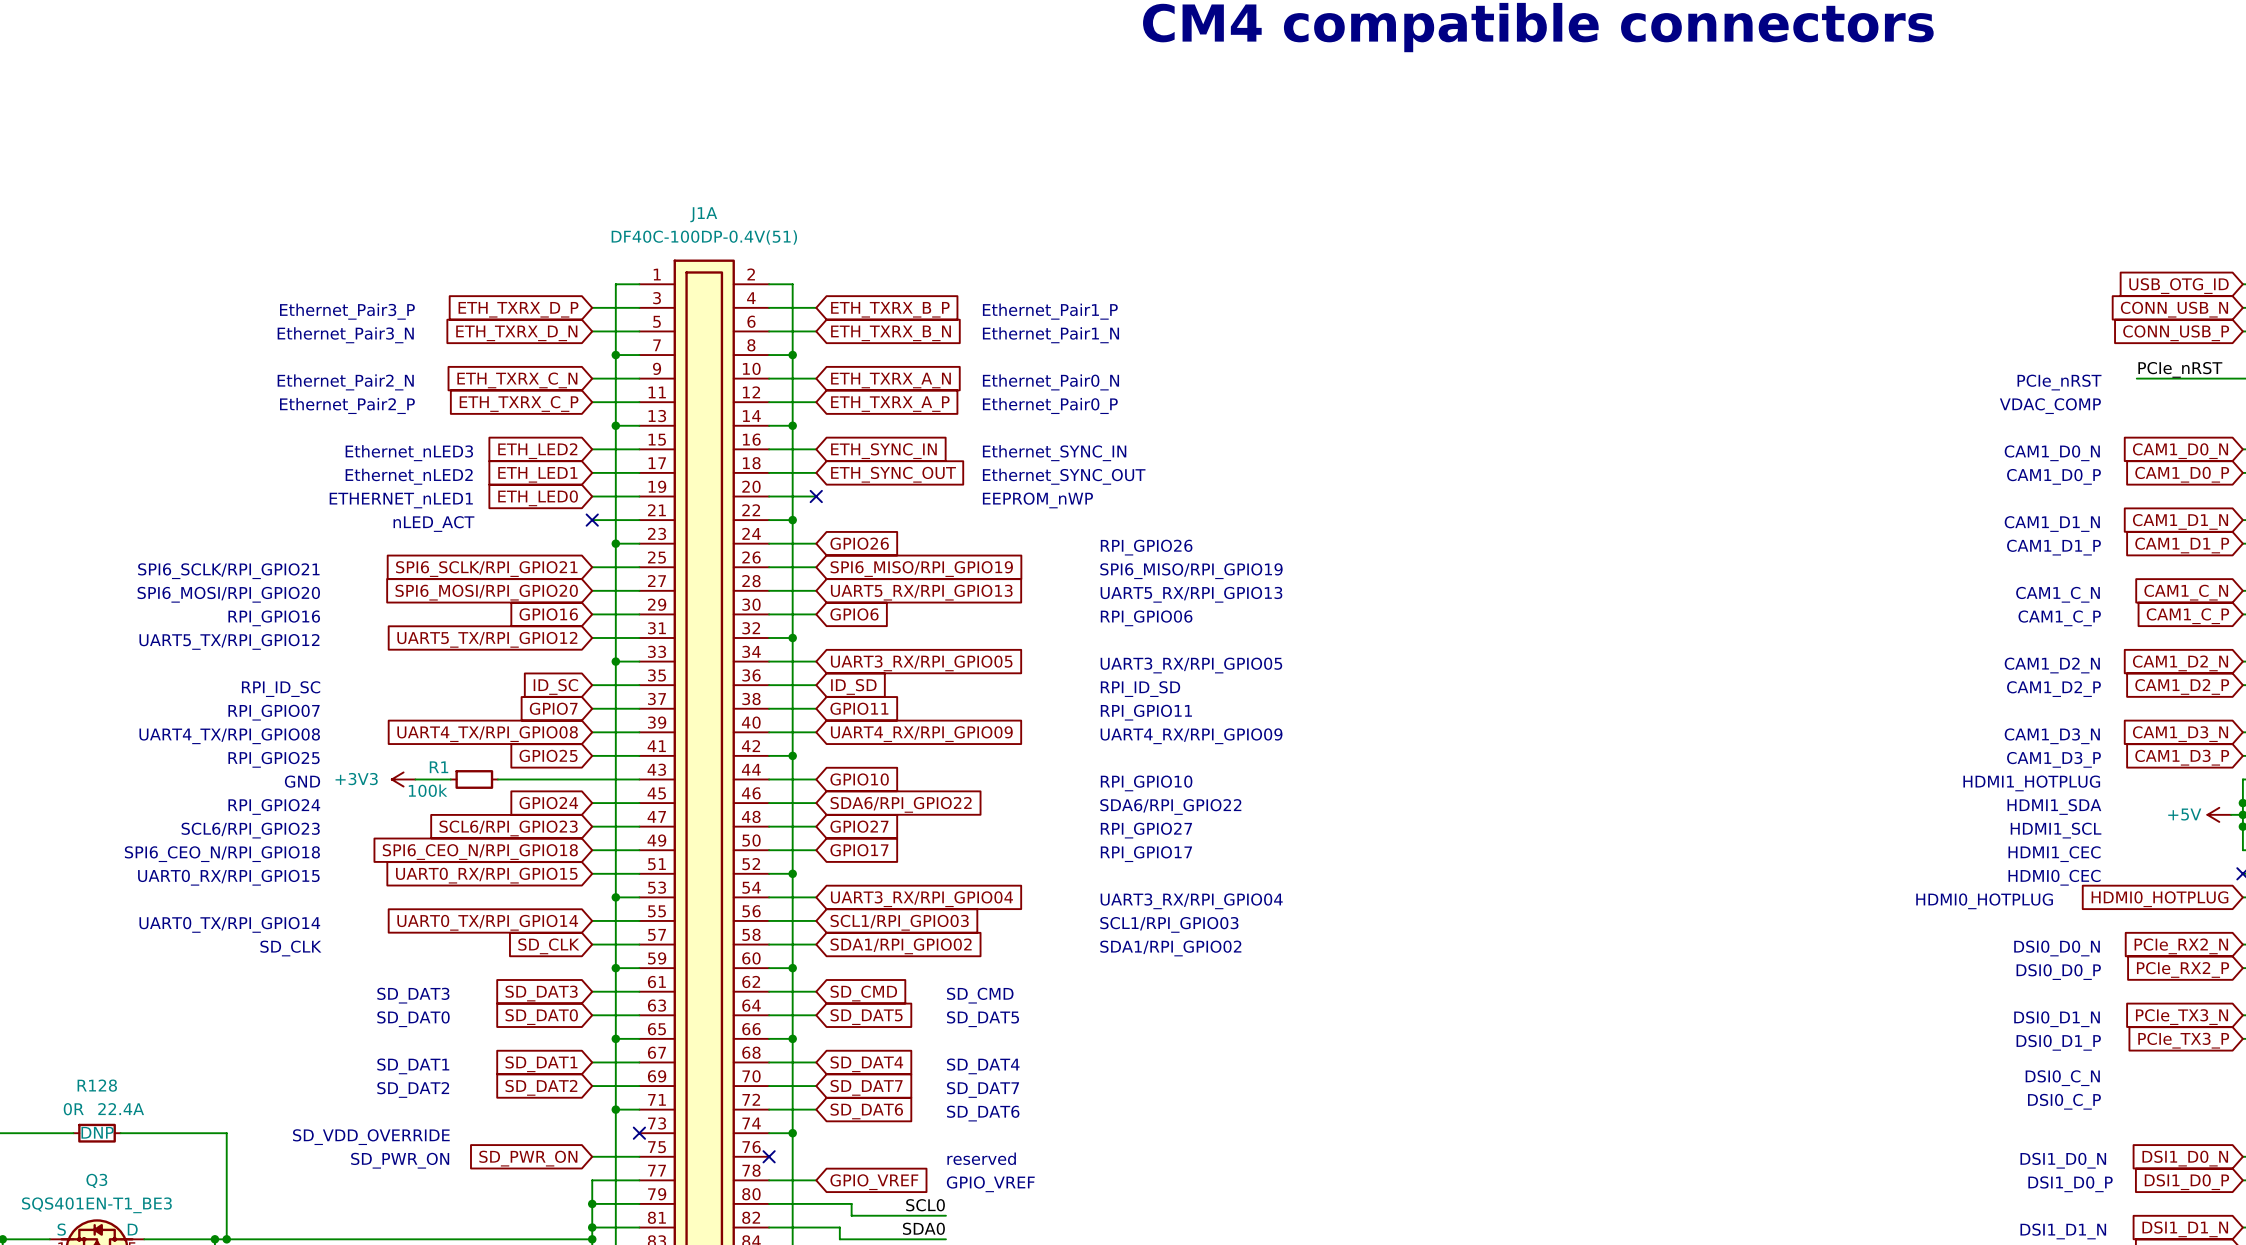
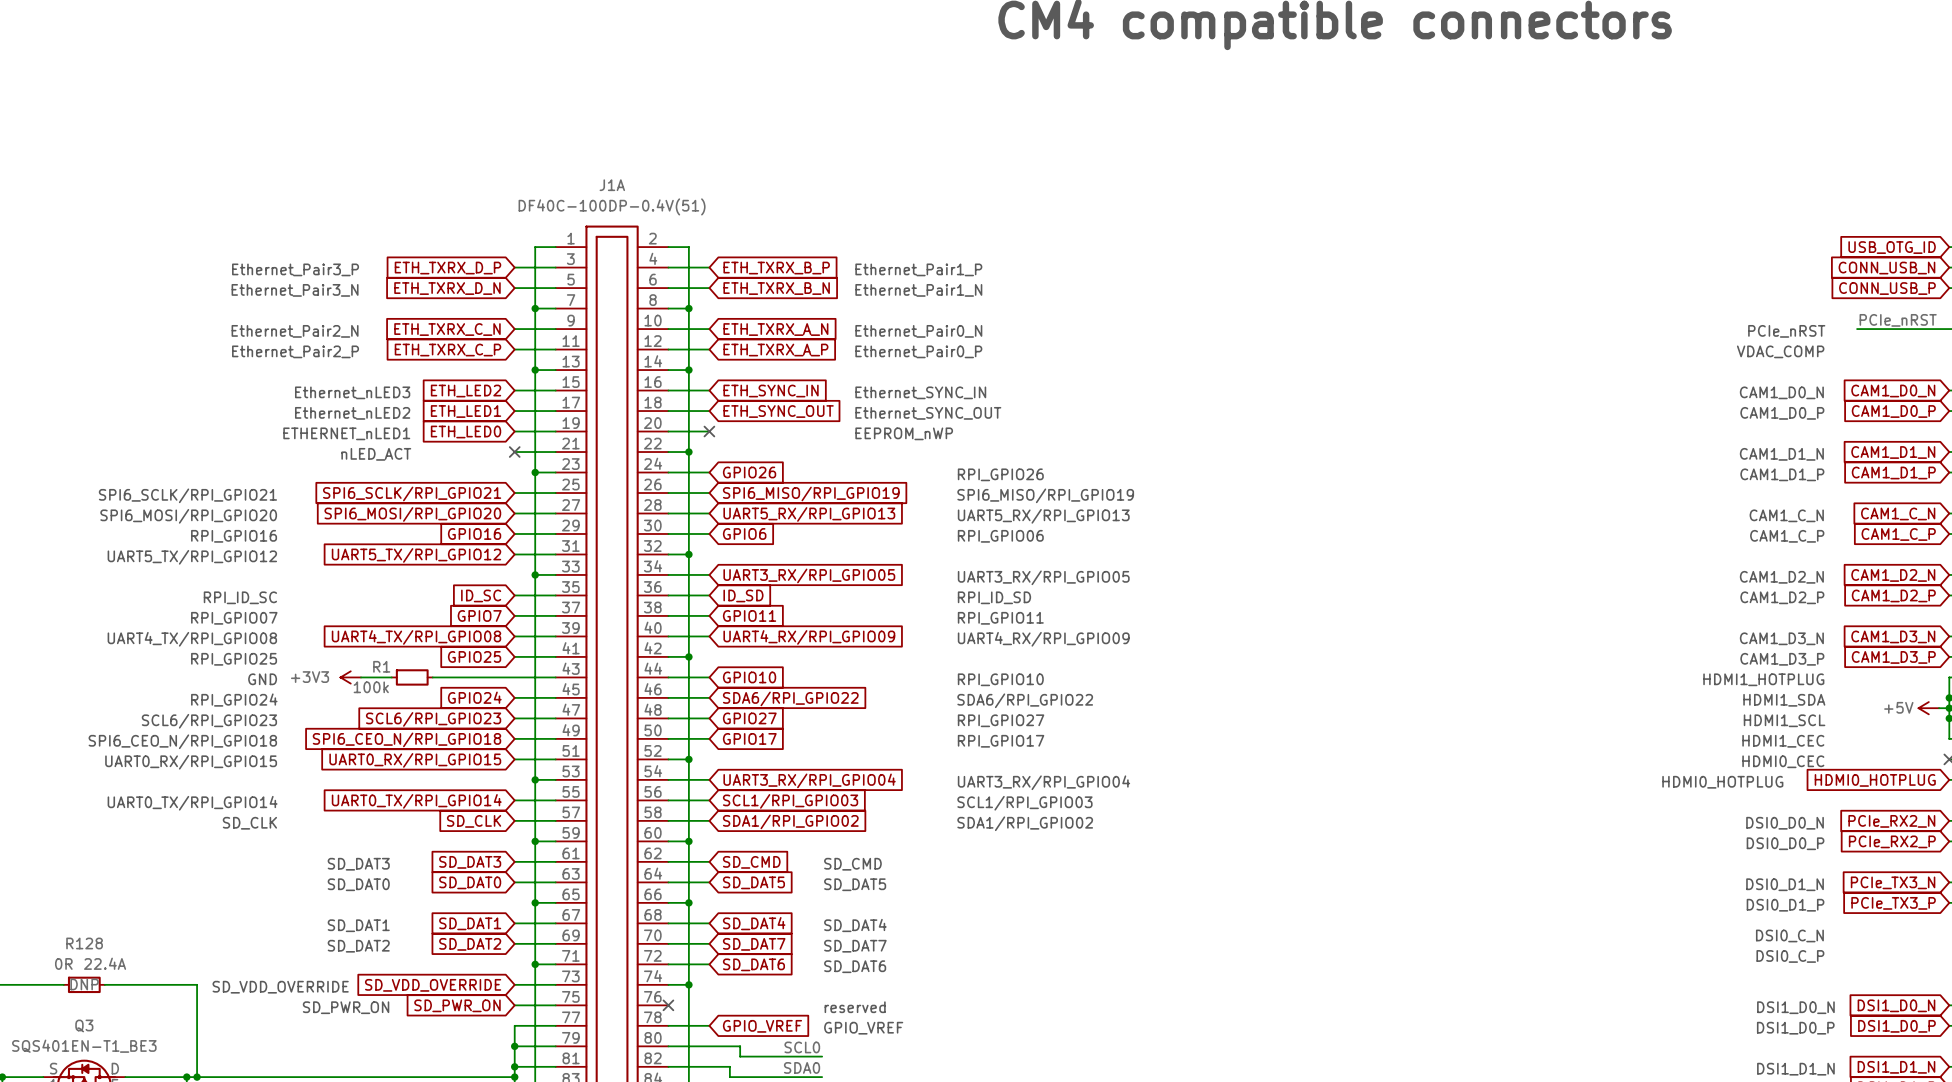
wire: none -> (514, 984) (555, 984)
no-connect mark: (639, 1133) -> none
global label: none -> SD_VDD_OVERRIDE (433, 985)
text position: SD_VDD_OVERRIDE (371, 1137) -> SD_VDD_OVERRIDE (280, 987)

